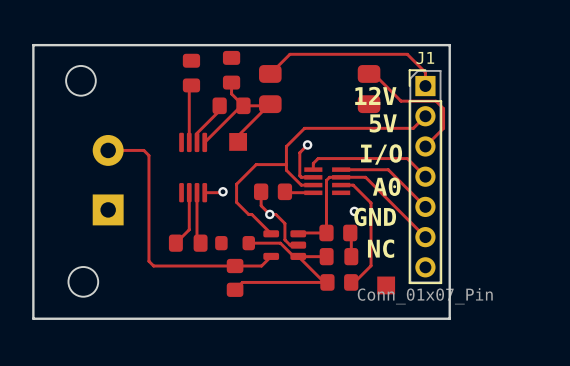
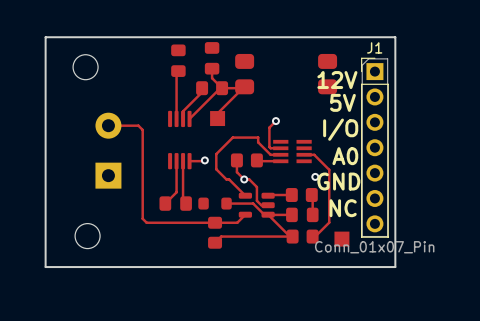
top track: (270, 73) (289, 54) (407, 54) (425, 72) (425, 86) -> none
top track: (369, 73) (373, 73) (401, 101) (436, 101) (443, 108) (443, 128) (425, 146) -> none
top track: (425, 116) (413, 128) (304, 128) (286, 146) (286, 164) -> none
top track: (313, 169) (313, 163) (318, 158) (407, 158) (425, 176) -> none
top track: (341, 169) (388, 169) (425, 206) -> none
top track: (326, 232) (326, 180) (329, 177) (365, 177) (425, 237) -> none

